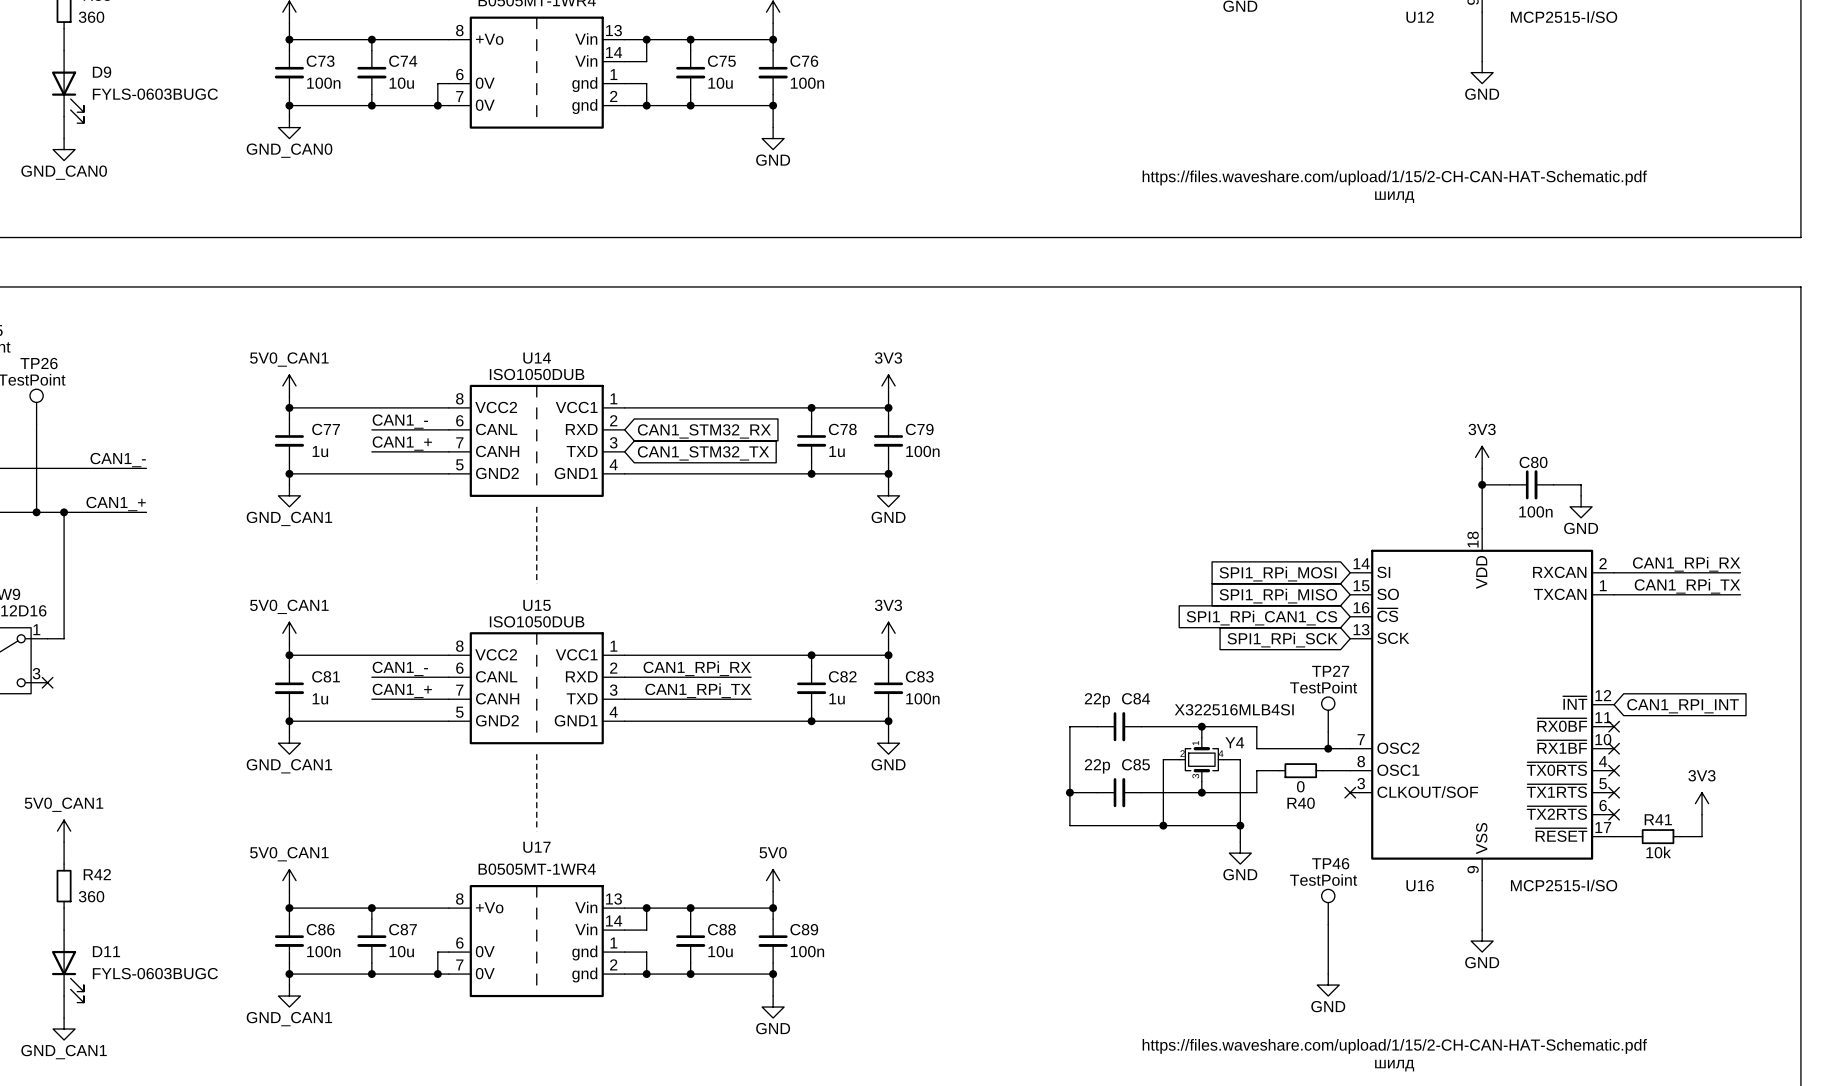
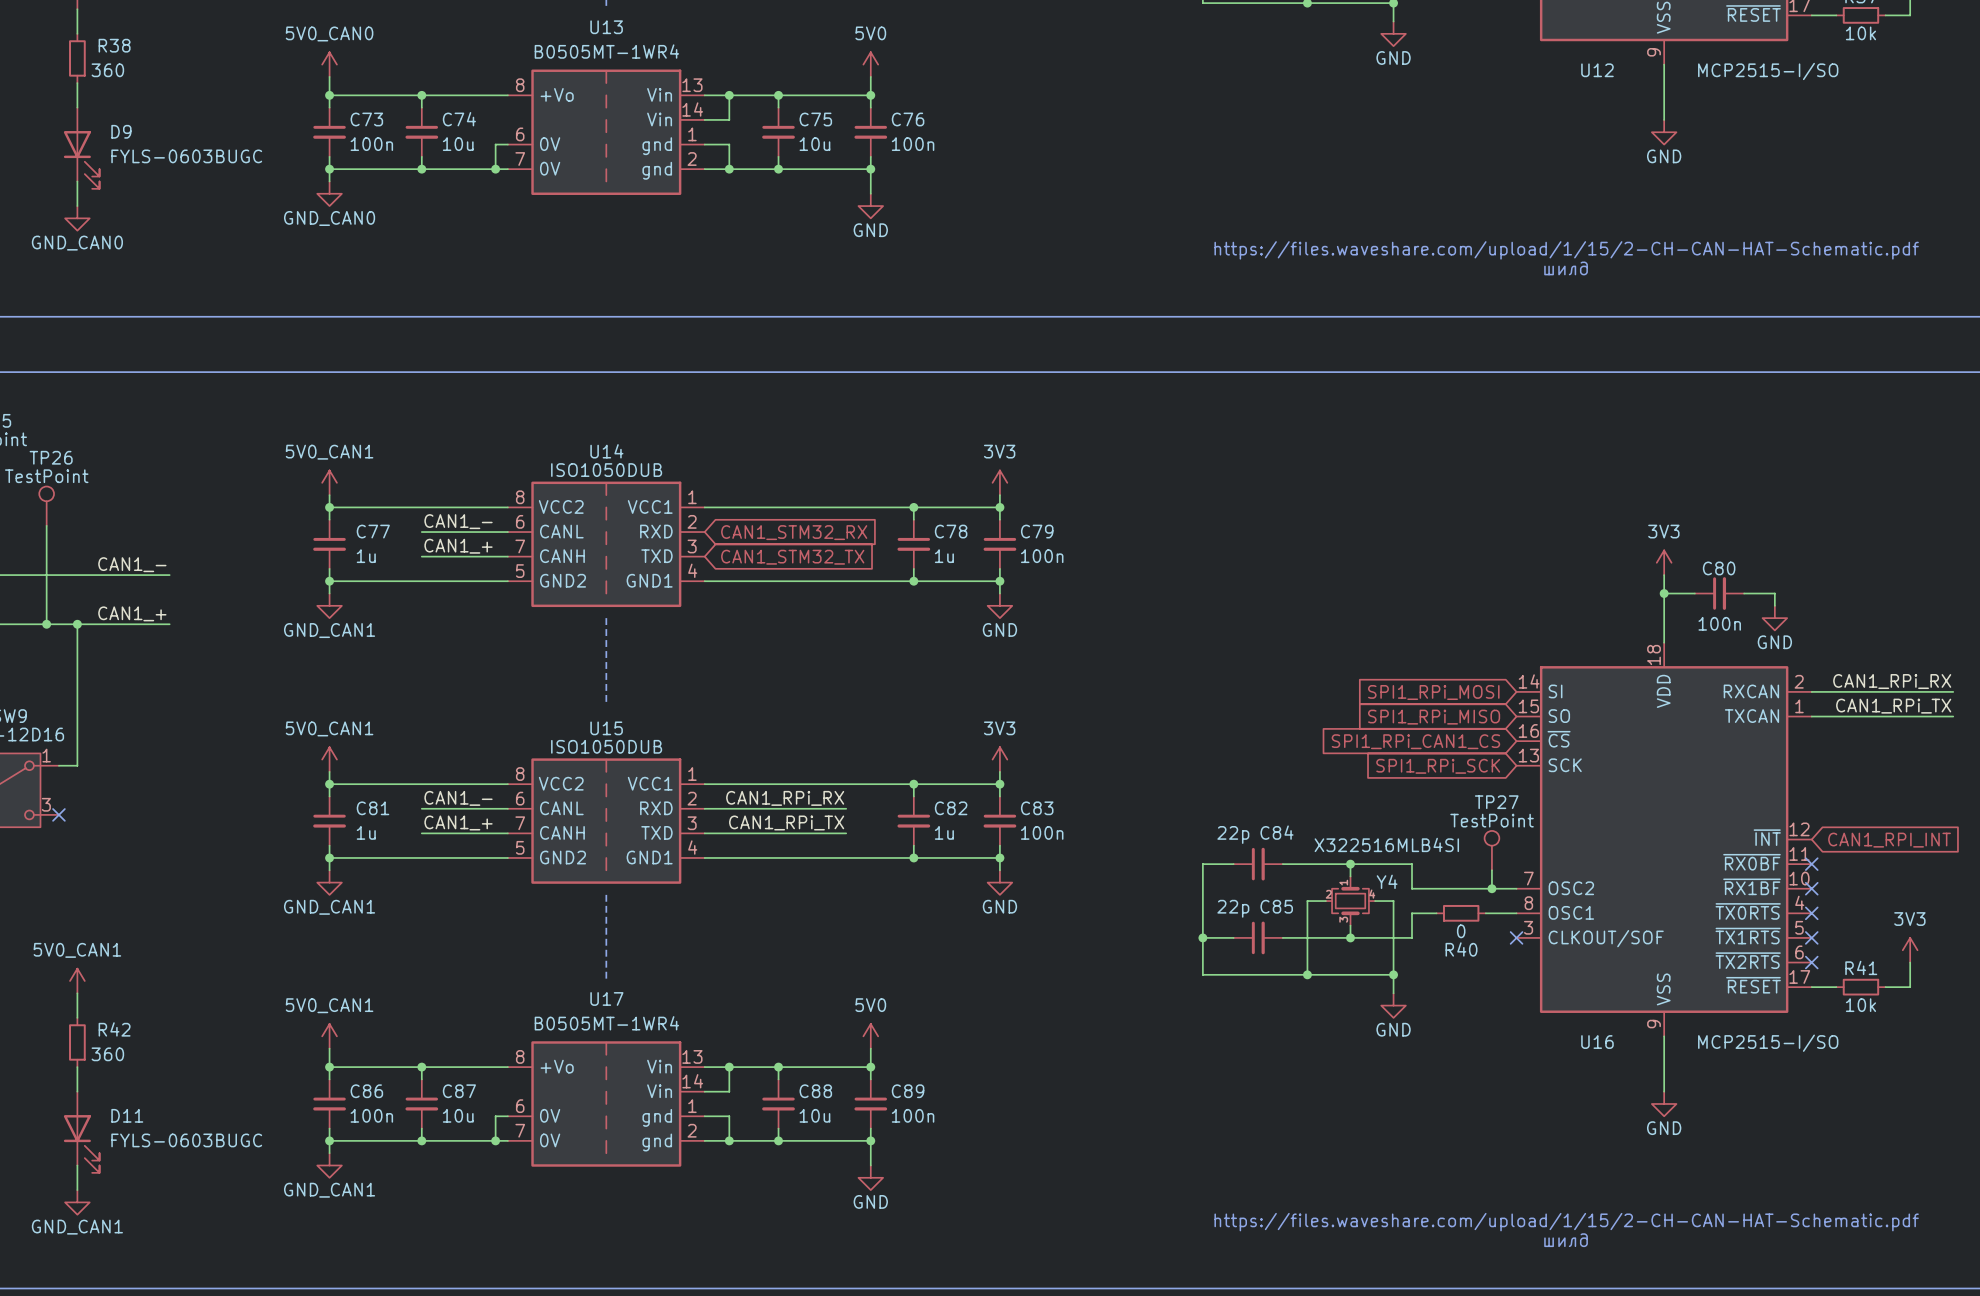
TP46: TestPoint (1328, 906) -> none
wire: (1328, 924) (1328, 974) -> none
power symbol: GND (1328, 985) -> none

